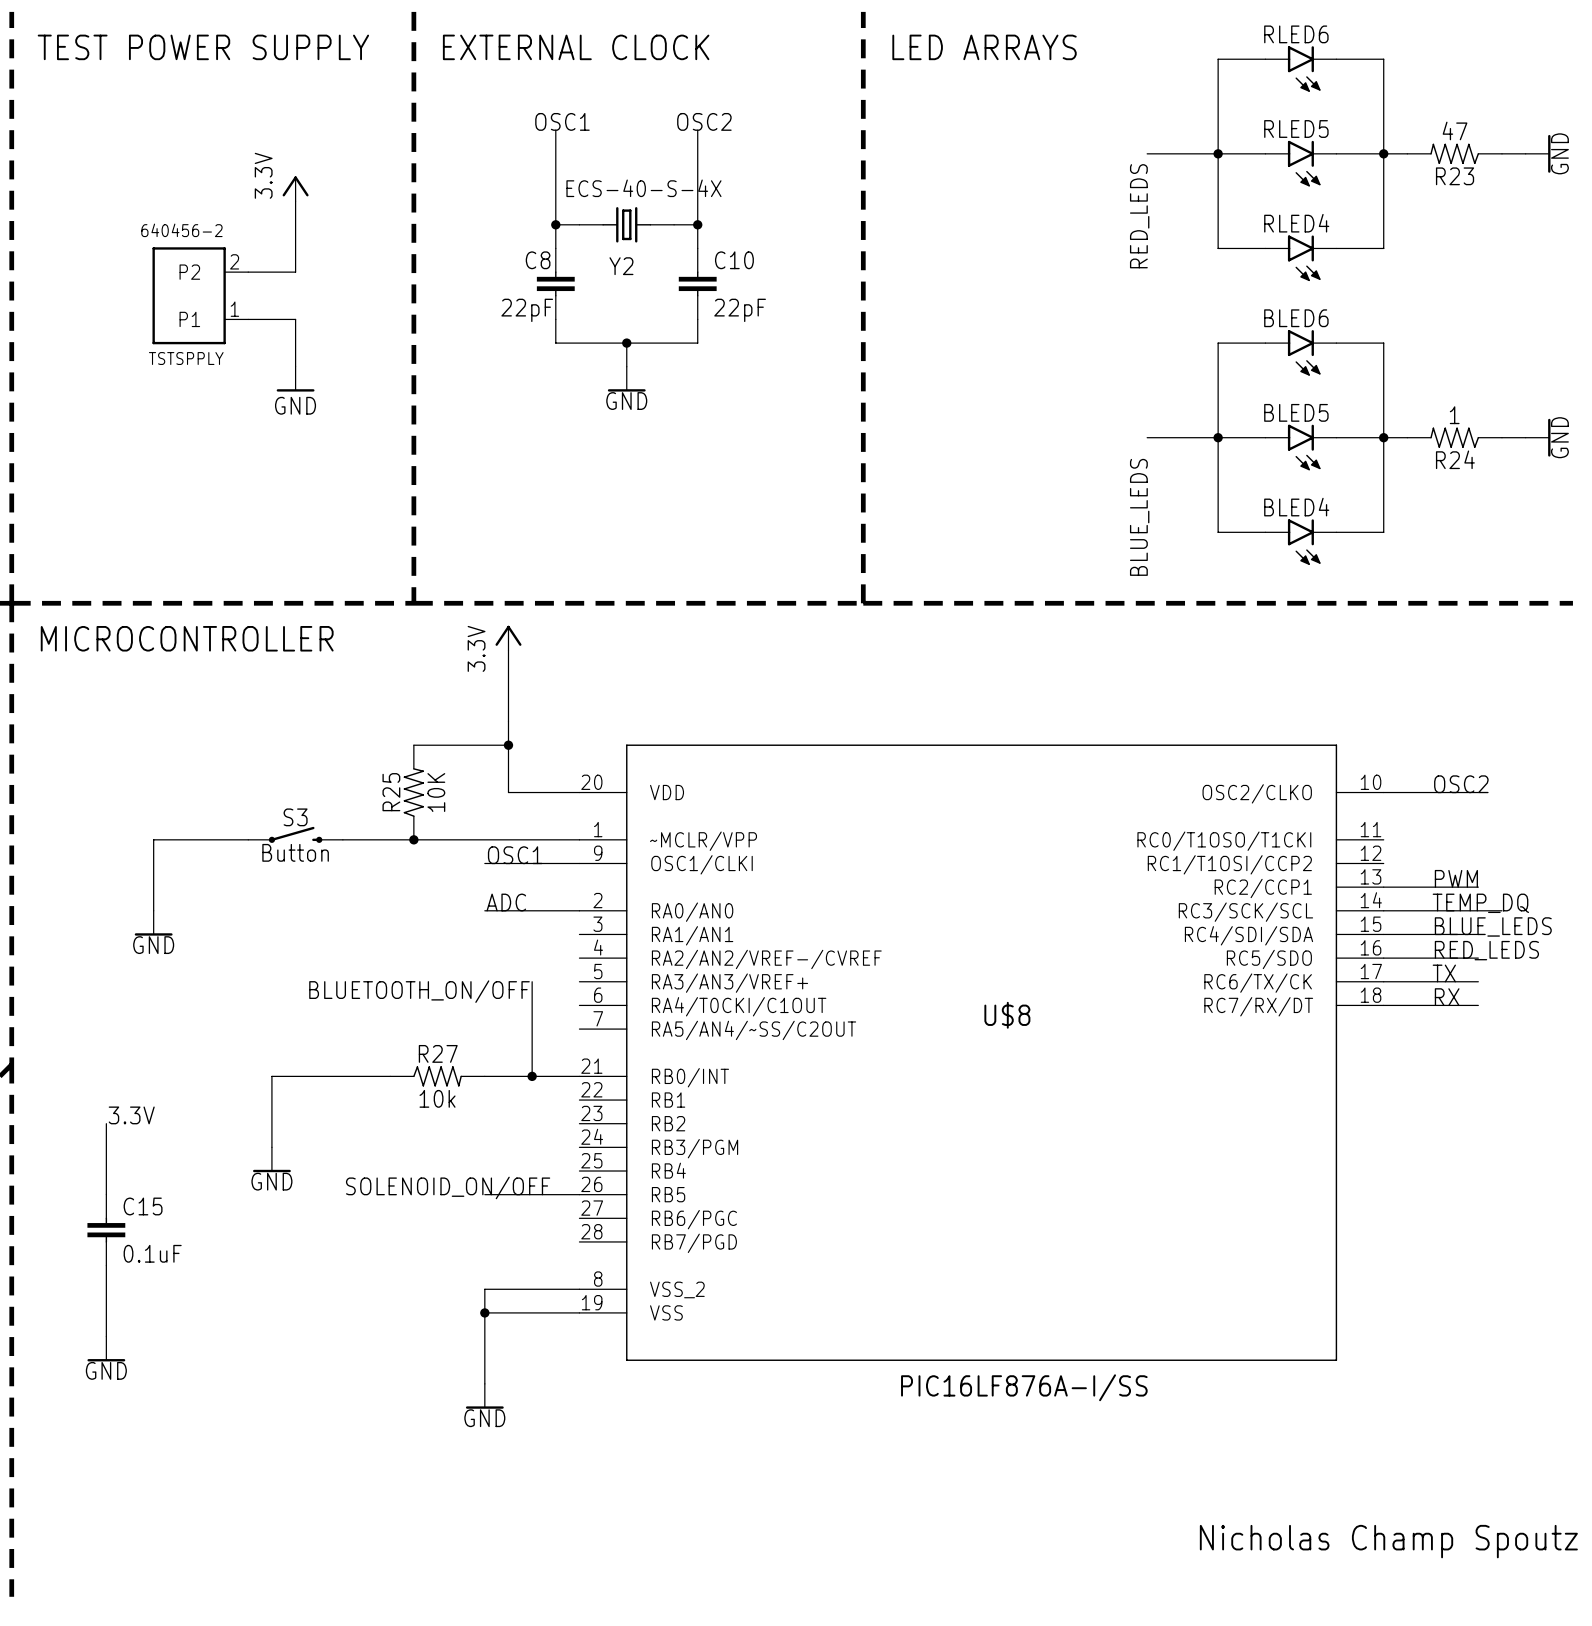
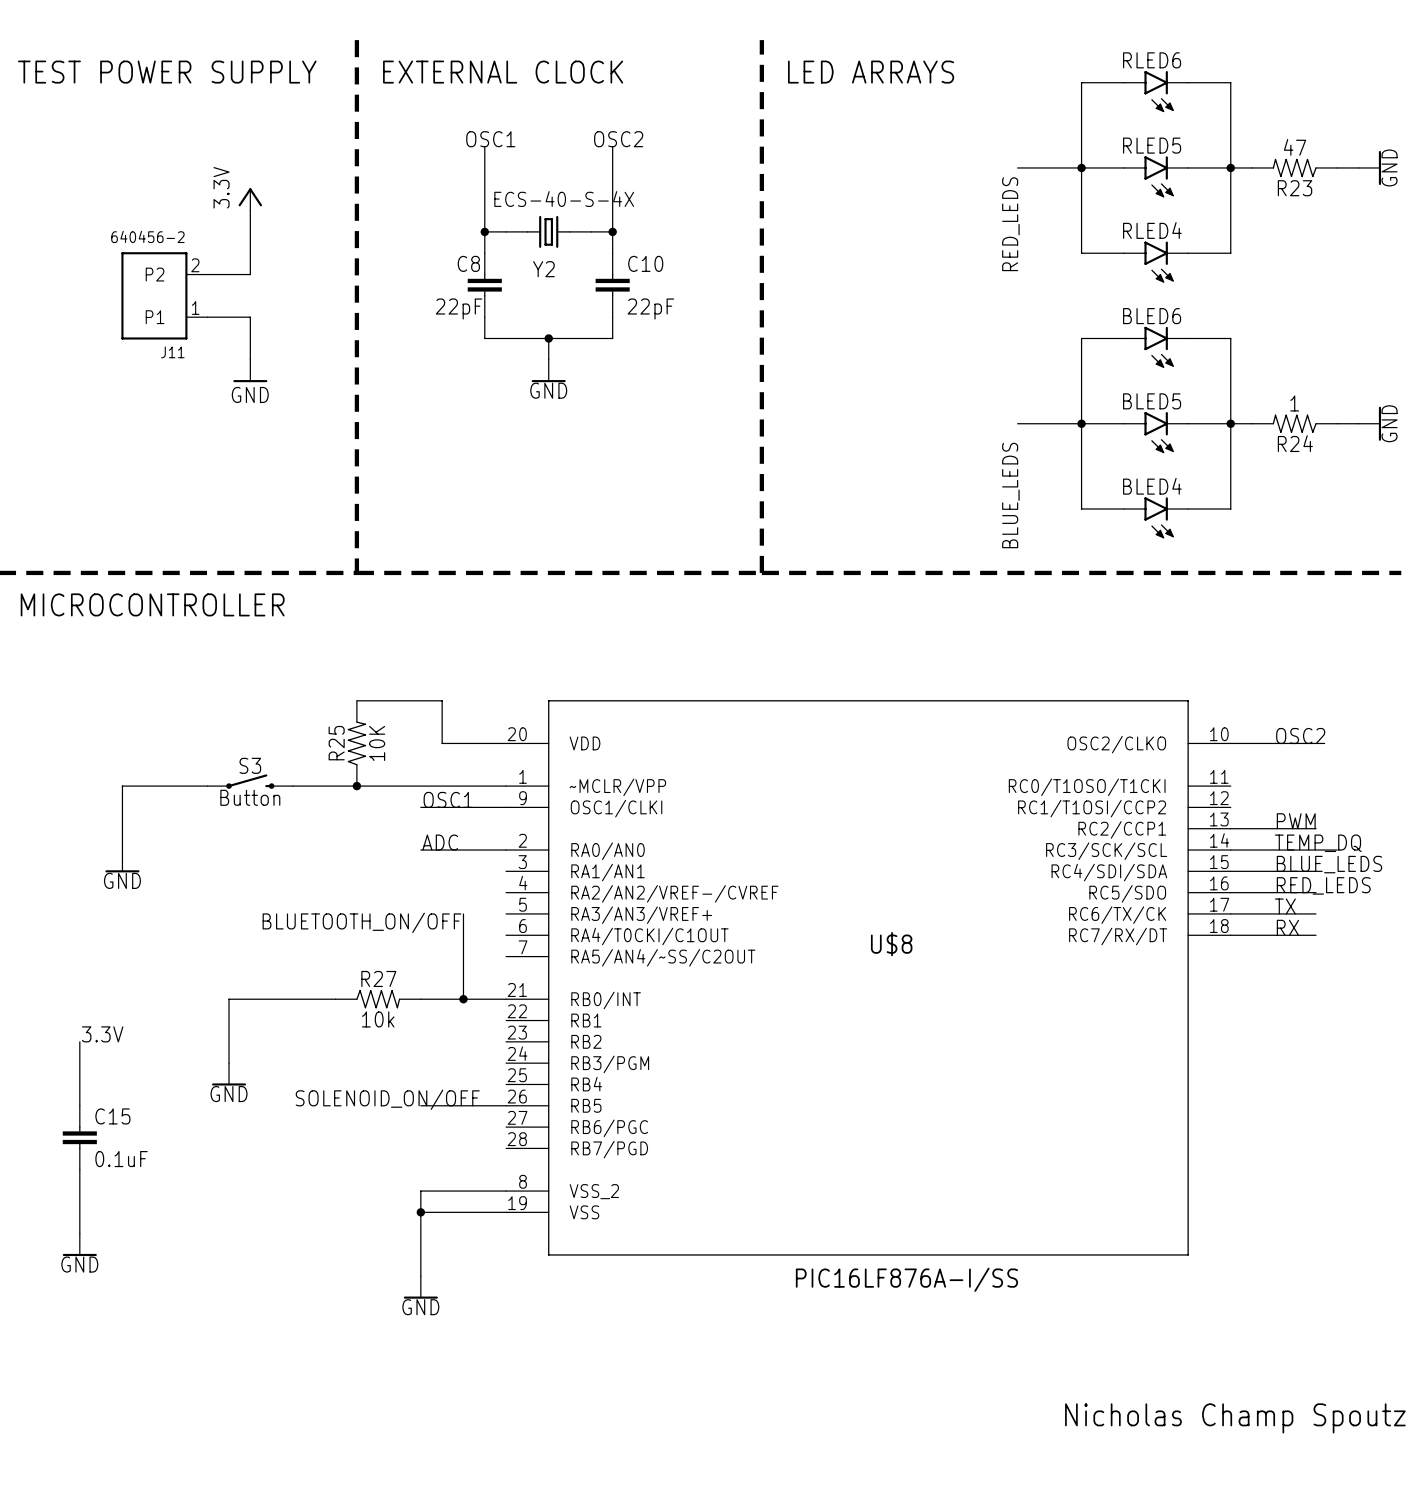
TSTSPPLY name: TSTSPPLY (186, 358) -> J11 (172, 352)
power symbol: 3.3V (508, 638) -> none
wire: (508, 650) (508, 745) -> none
junction: (508, 745) -> none

